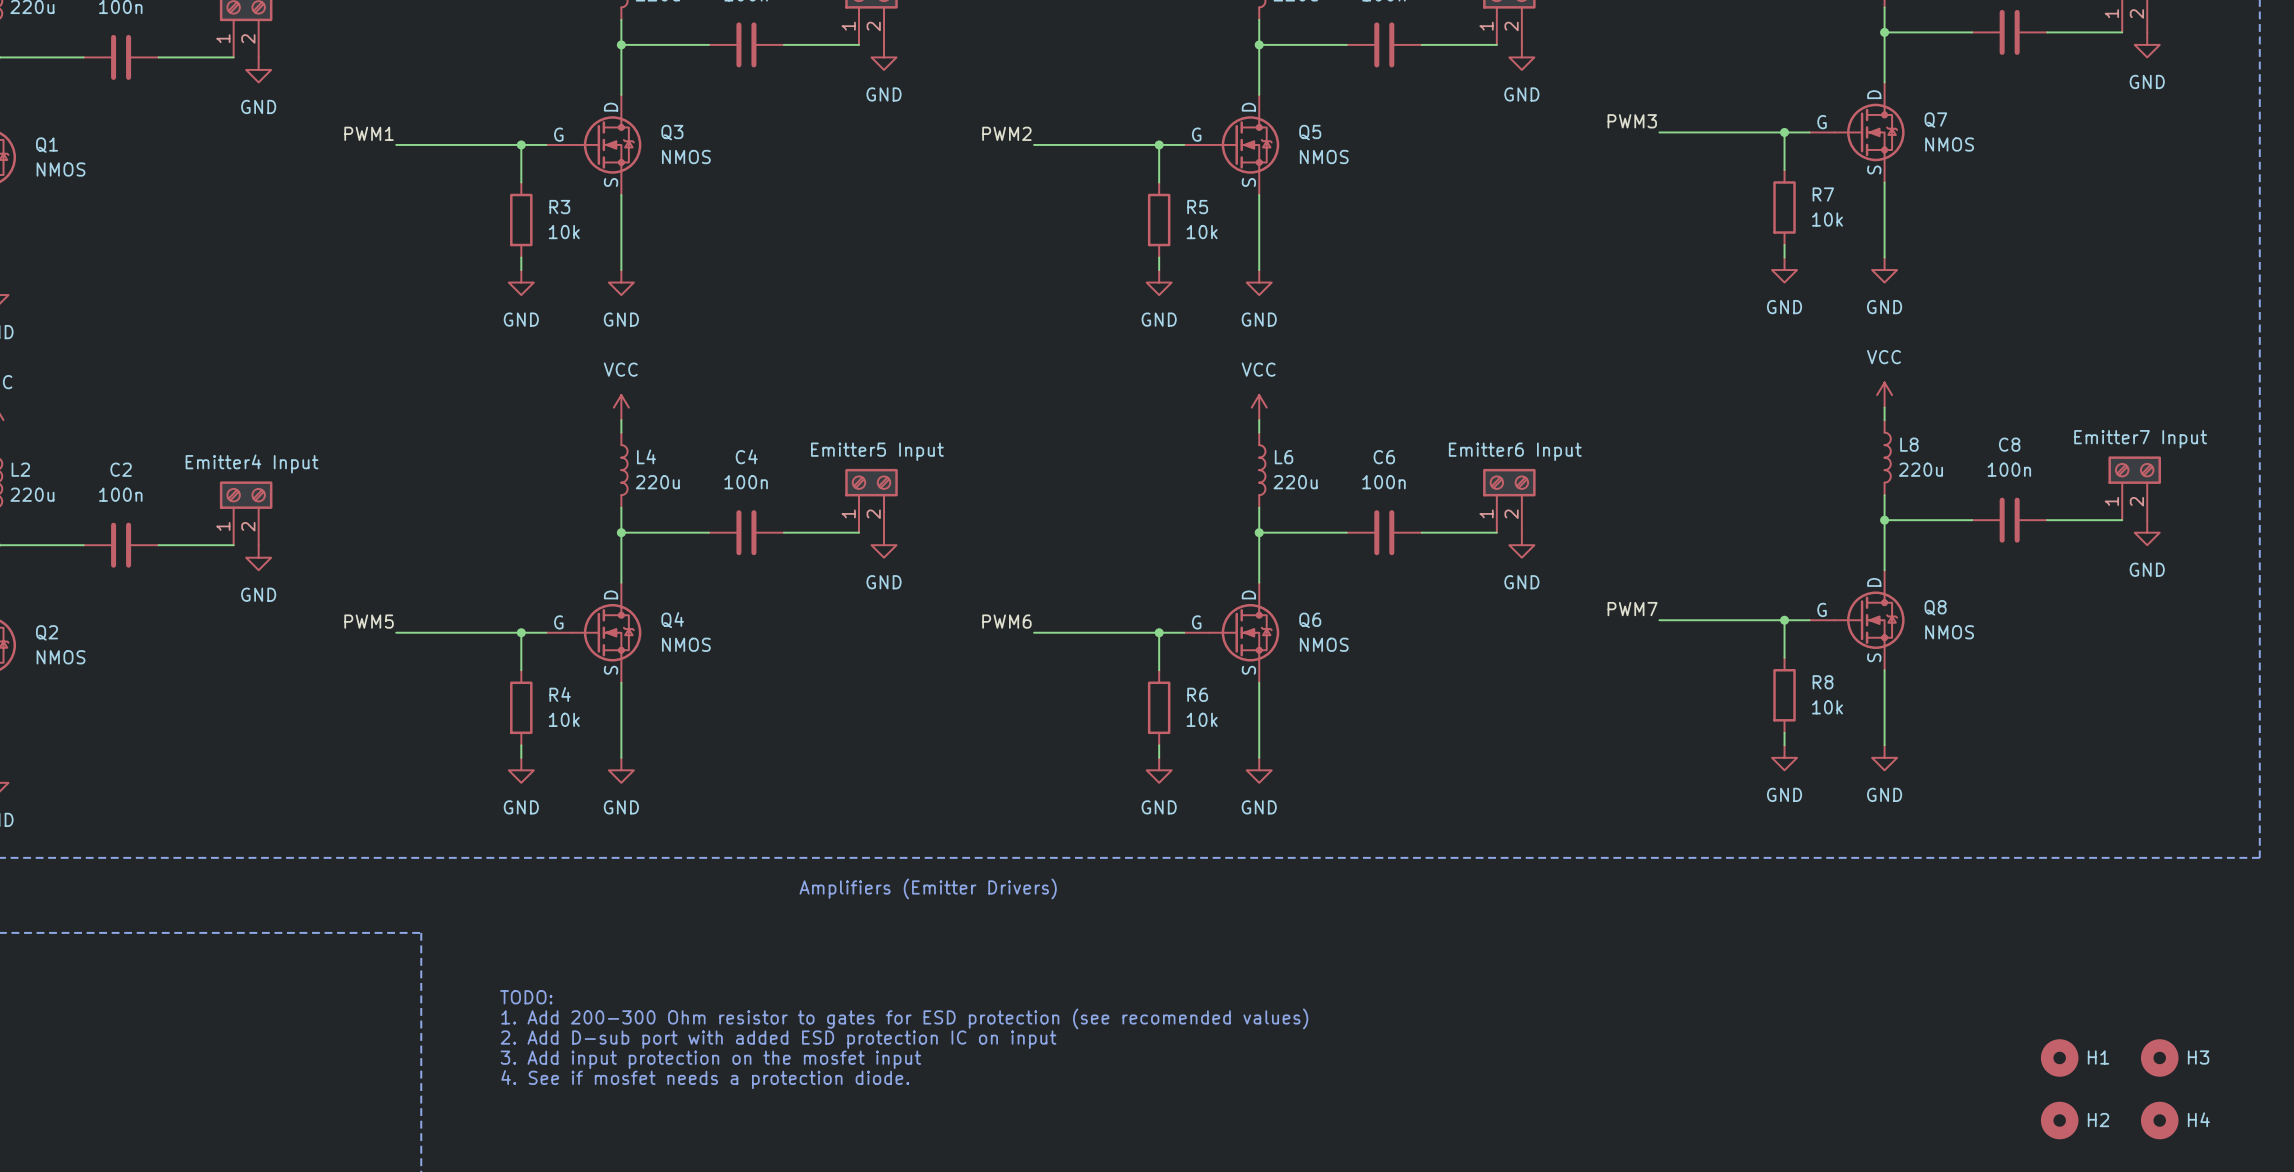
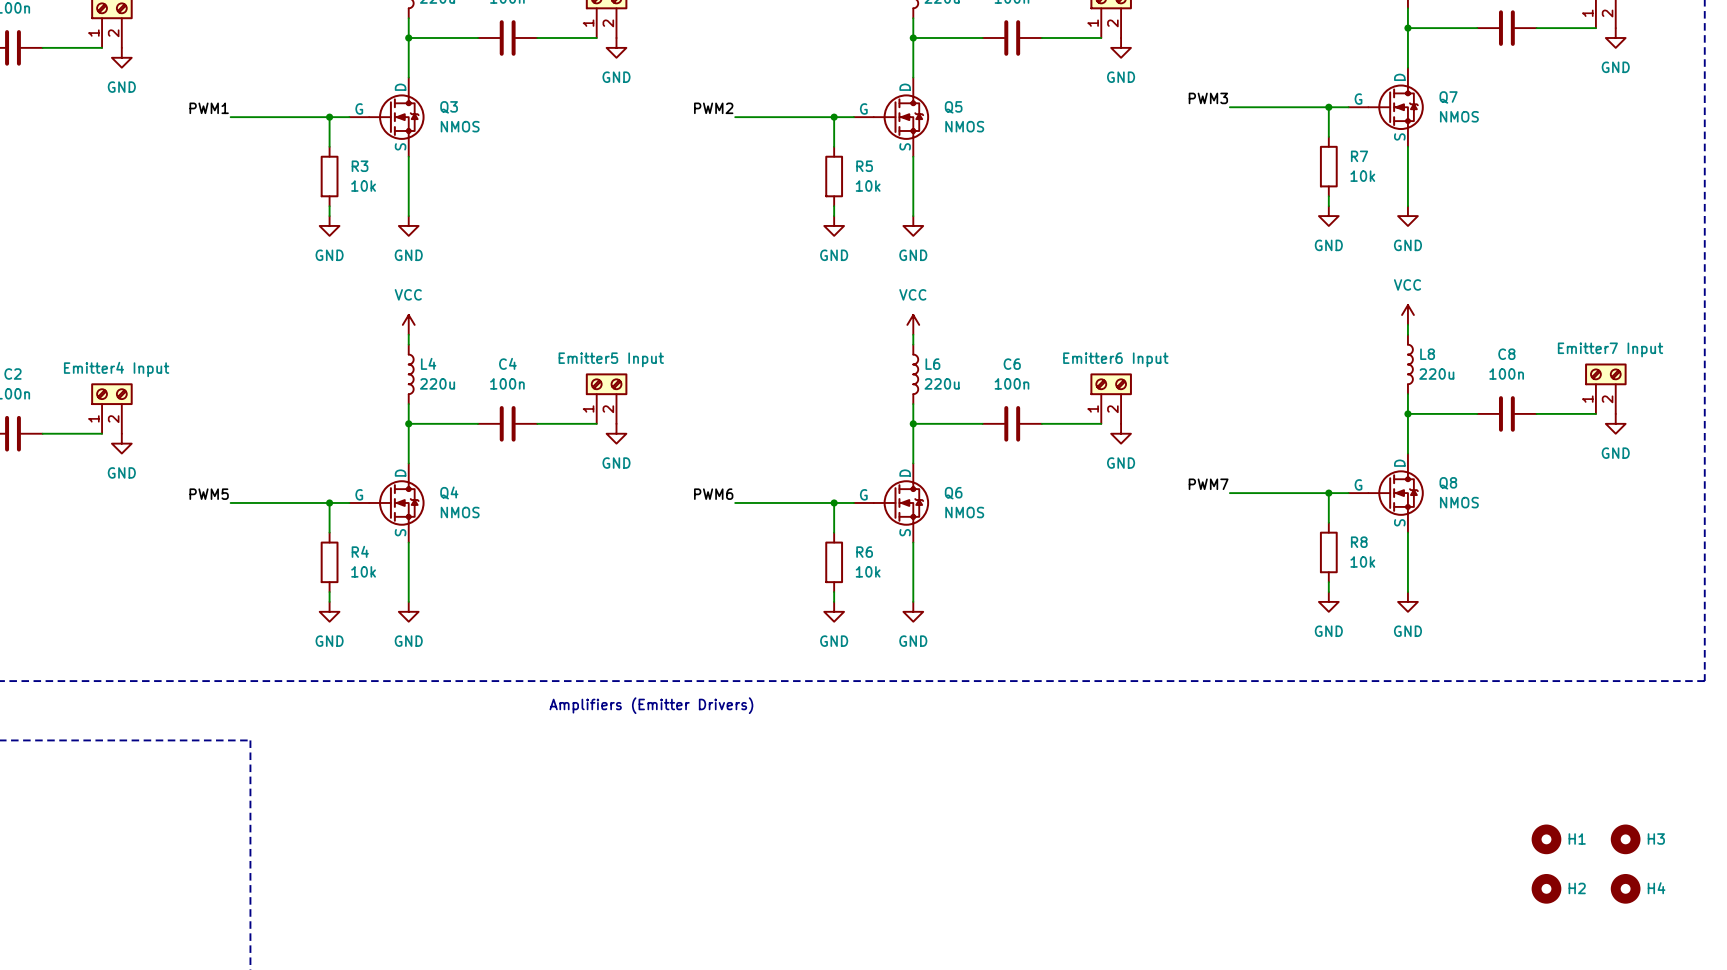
text: TODO: (526, 997) -> none
text: 1. Add 200-300 Ohm resistor to gates for ESD protection (see recomended values) (904, 1018) -> none
text: 2. Add D-sub port with added ESD protection IC on input (778, 1039) -> none
text: 3. Add input protection on the mosfet input (710, 1059) -> none
text: 4. See if mosfet needs a protection diode. (705, 1079) -> none

